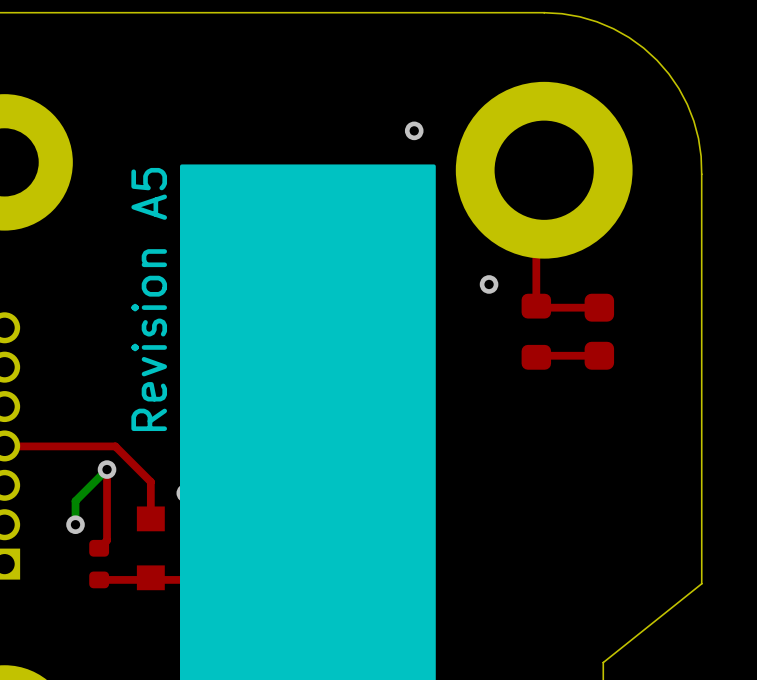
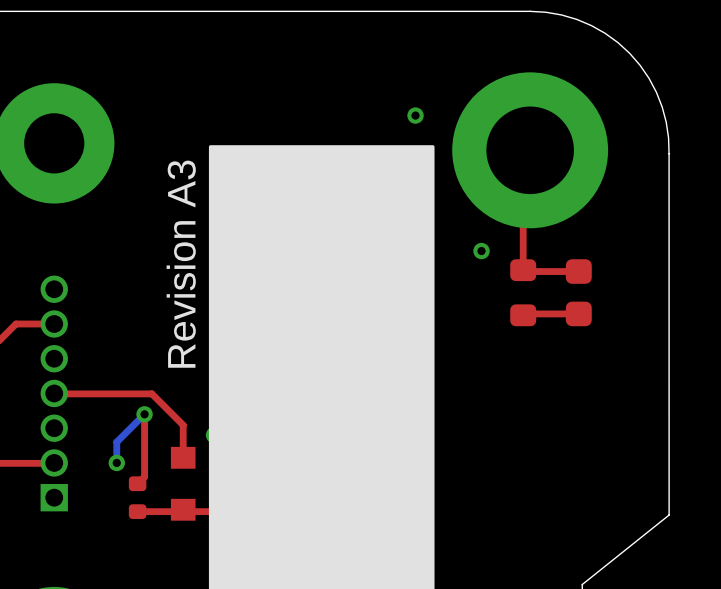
text: Revision A5 (149, 299) -> Revision A3 (181, 264)

